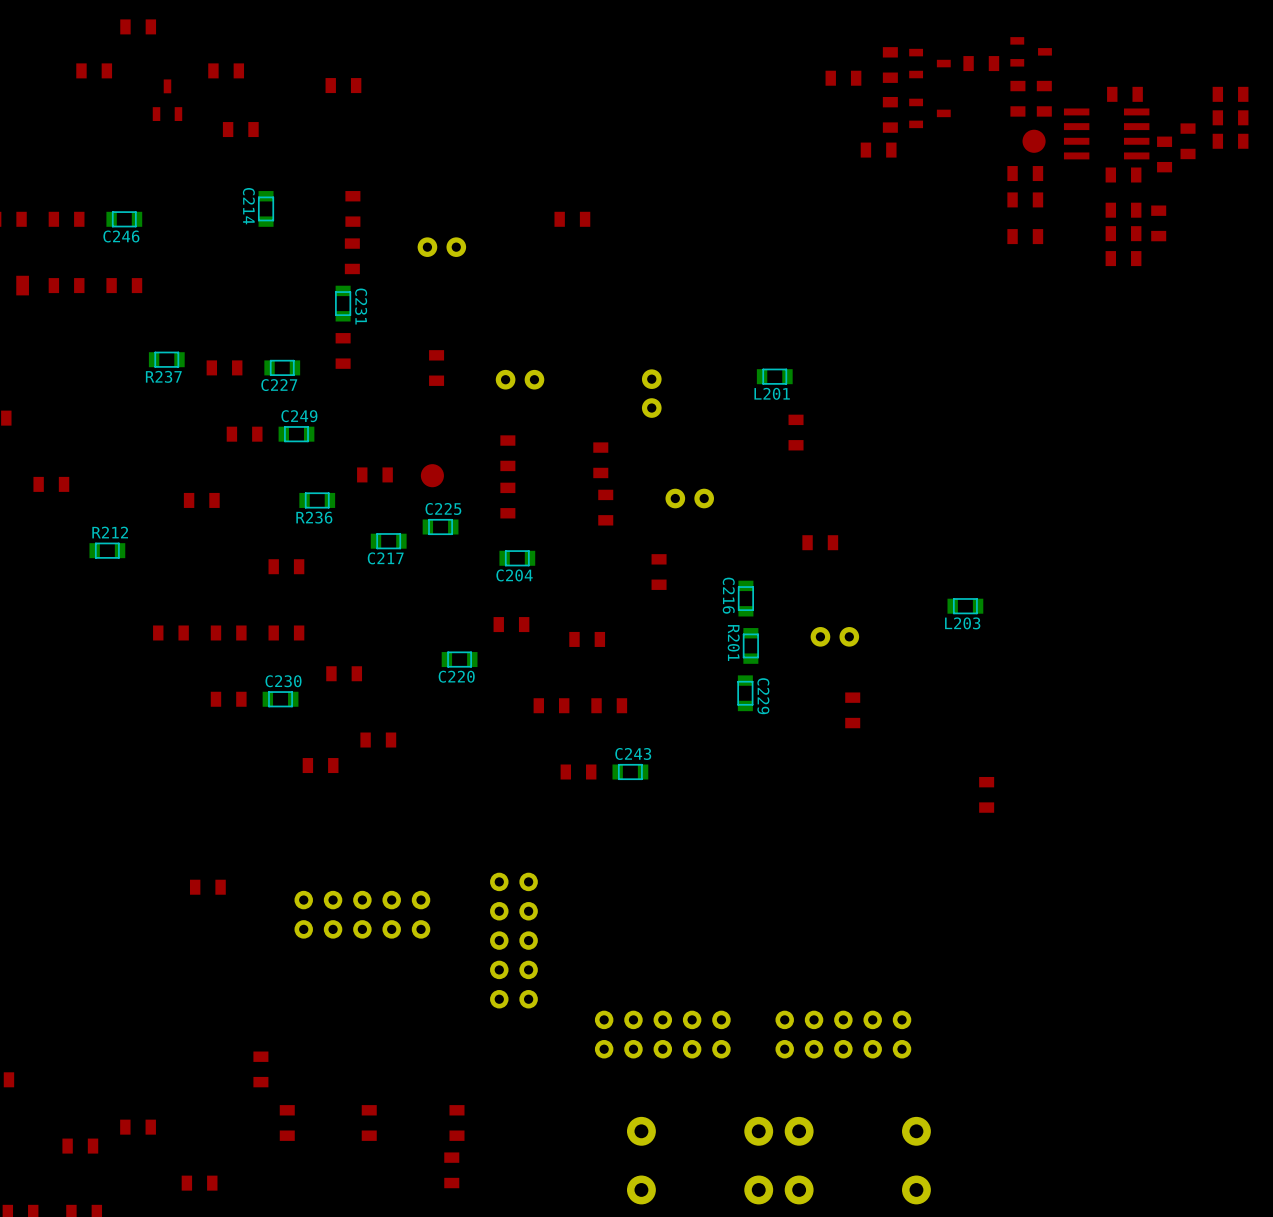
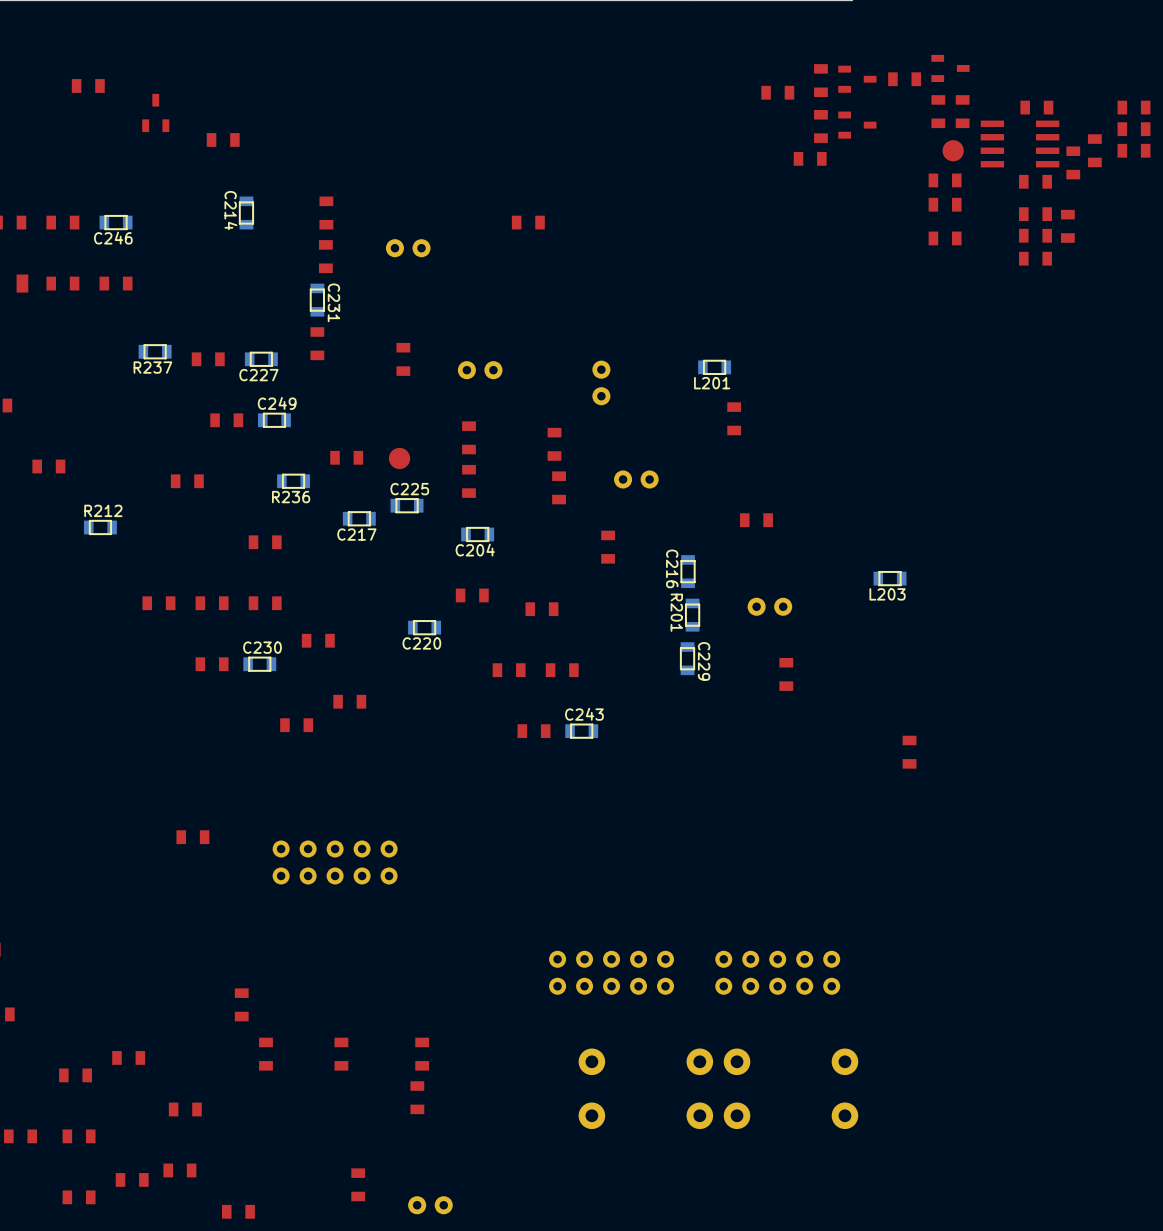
part: (138, 26) -> none
part: (226, 70) -> none
part: (343, 85) -> none
part: (513, 940) -> none

